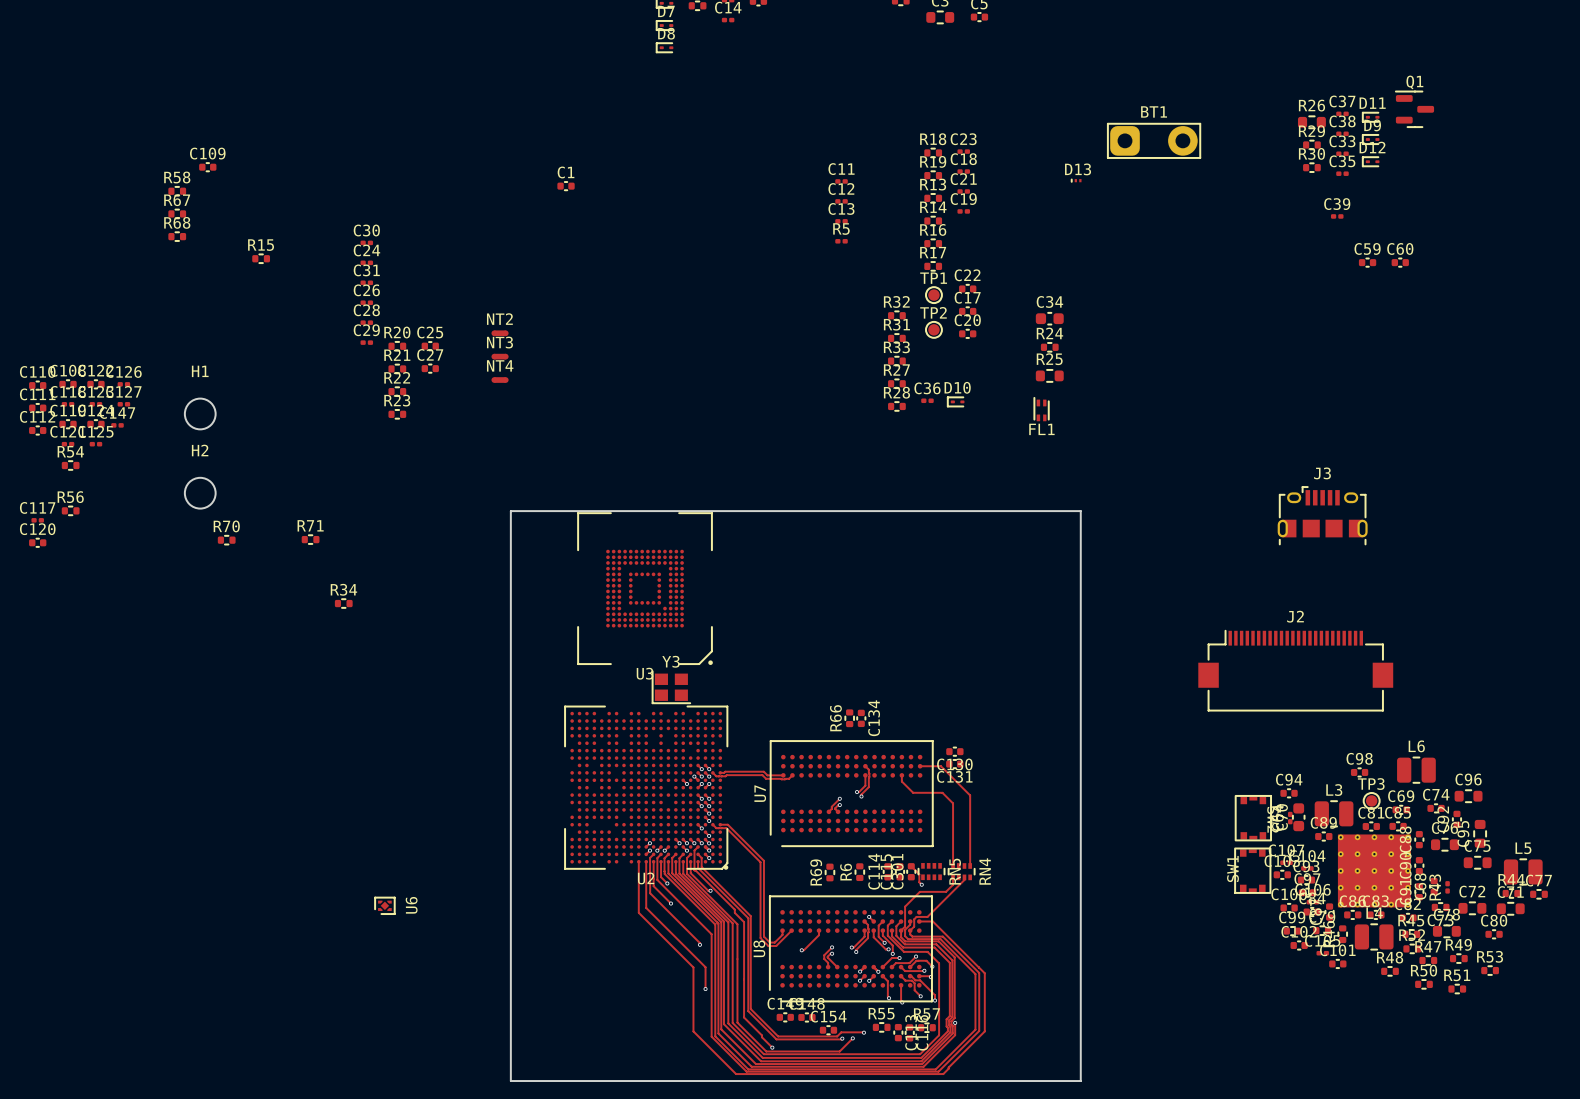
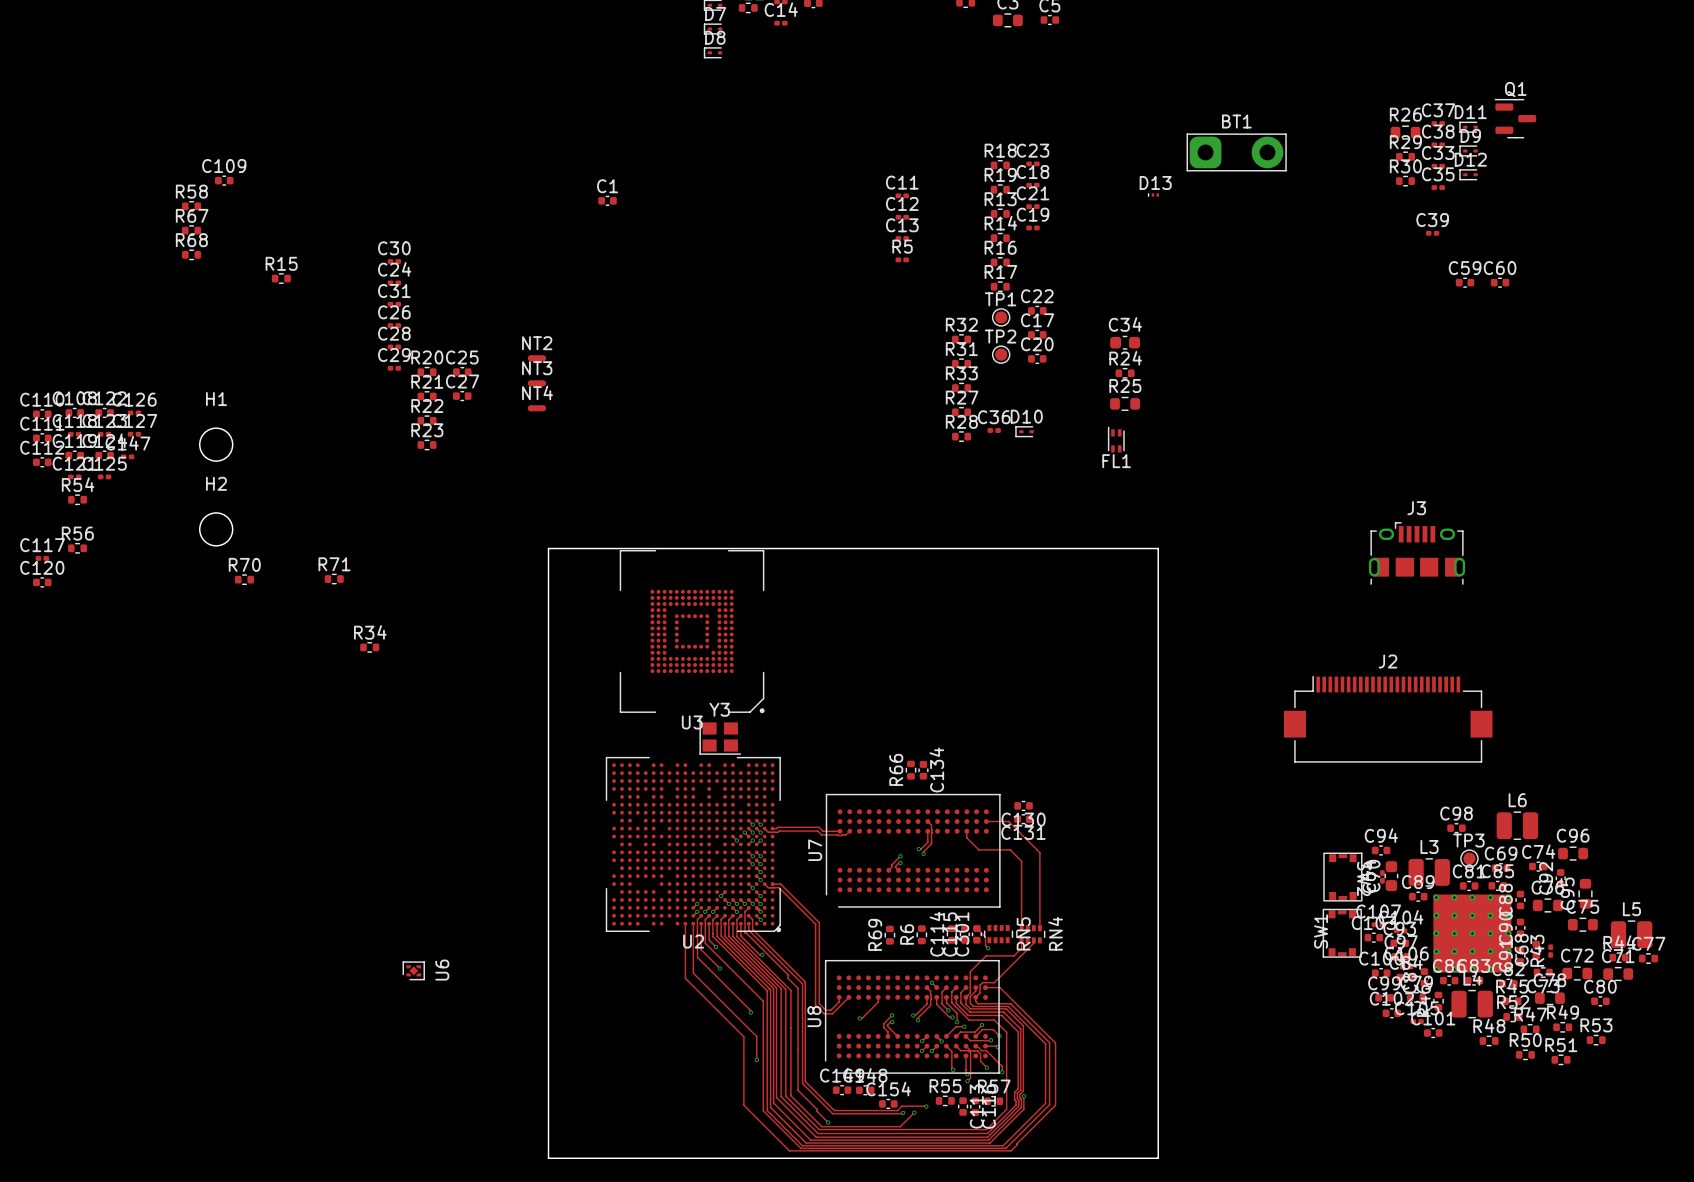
track: none -> (725, 892) (721, 896)
via: none -> (721, 896)
track: none -> (956, 1046) (960, 1050) (968, 1050) (970, 1053) (970, 1078) (967, 1081)
via: none -> (967, 1081)

